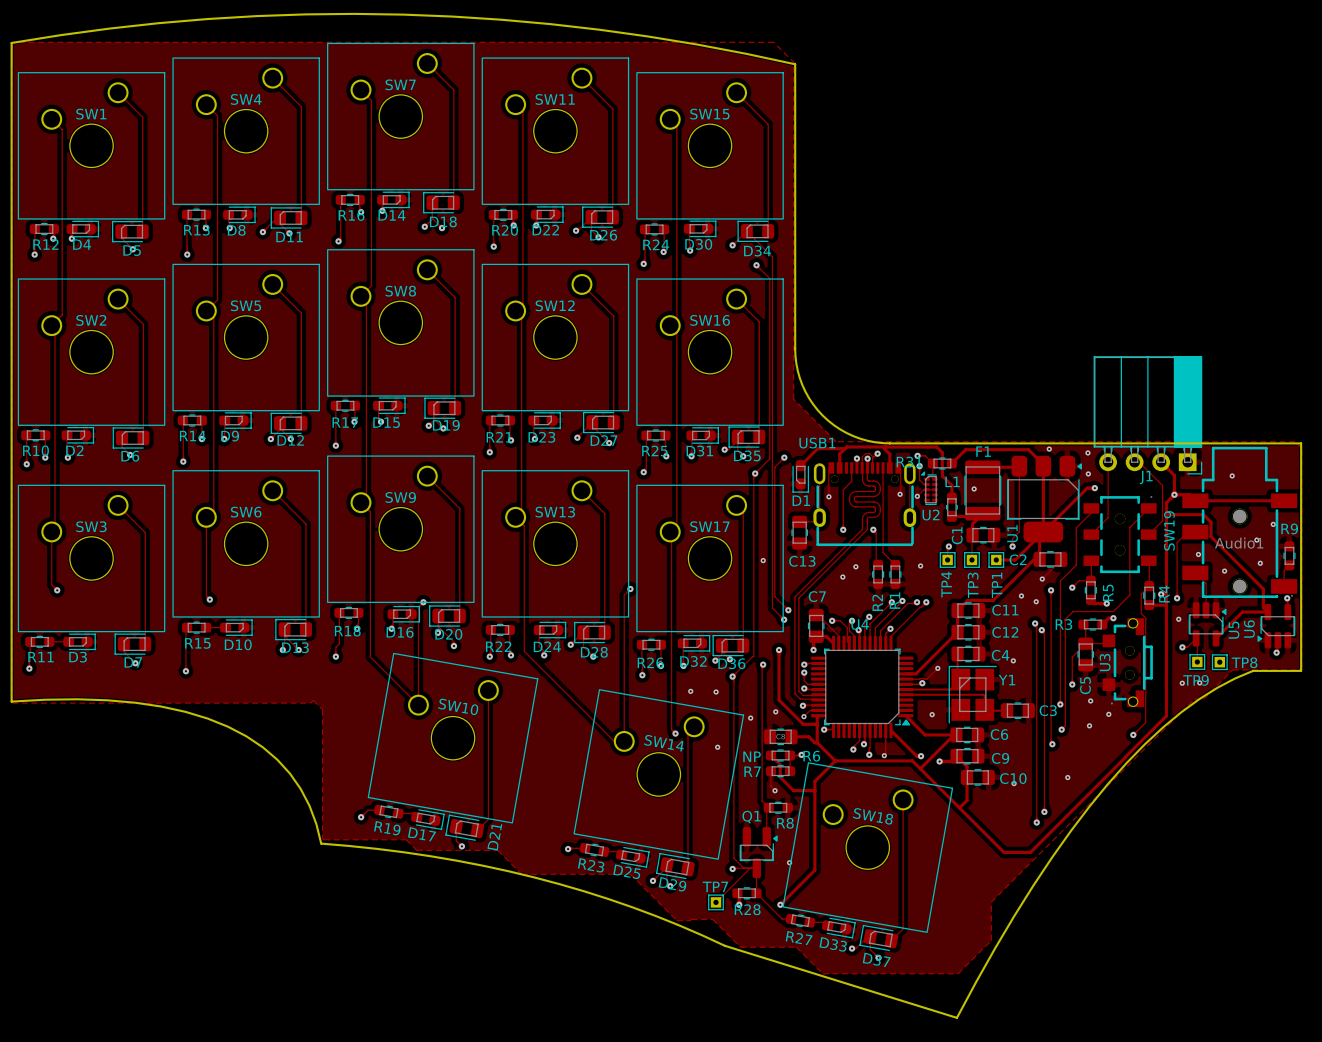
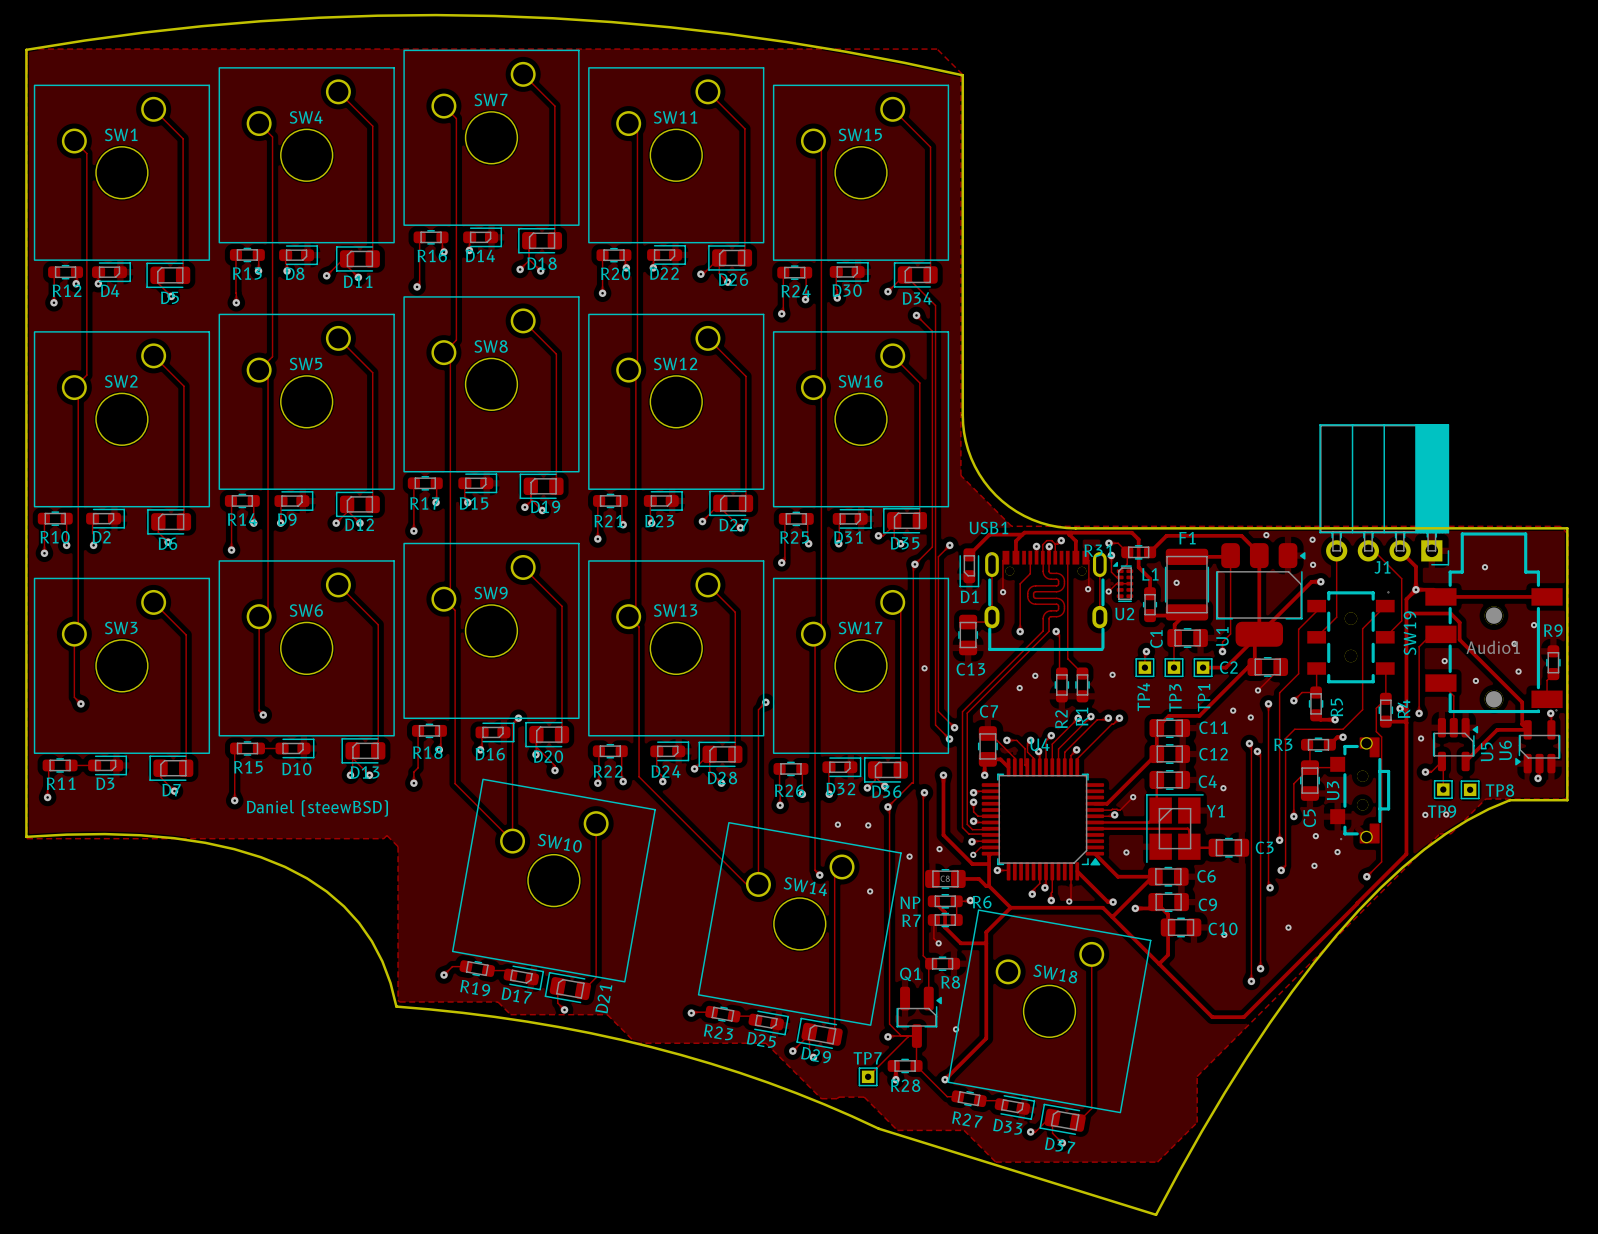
text: none -> Daniel (steewBSD) (317, 808)

